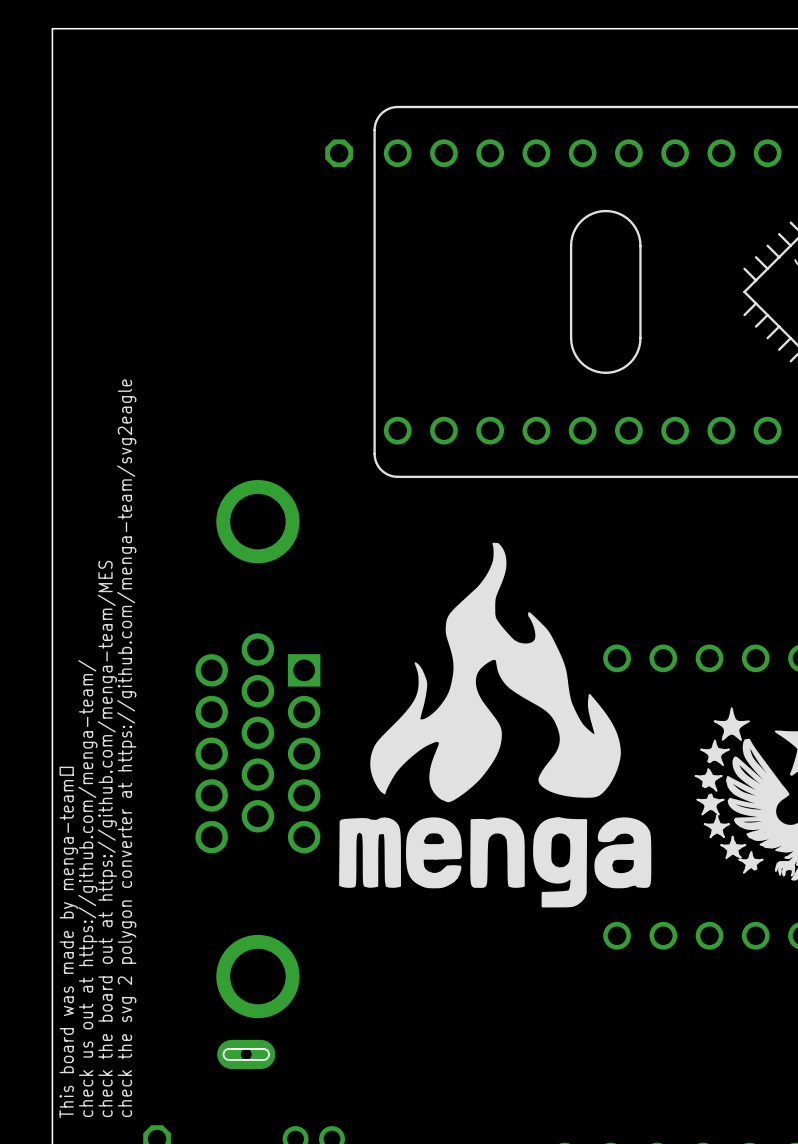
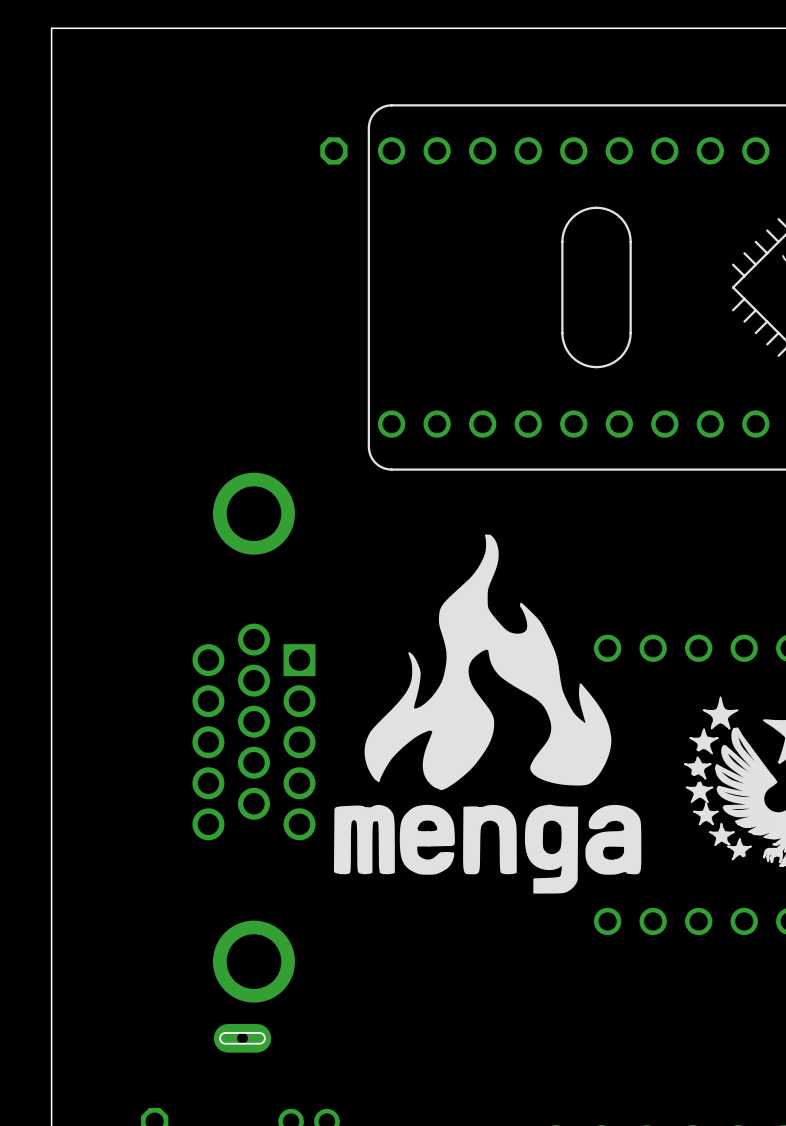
text: check the svg 2 polygon converter at https://github.com/menga-team/svg2eagle (126, 748) -> none
text: check the board out at https://github.com/menga-team/MES (107, 838) -> none
text: check us out at https://github.com/menga-team/ (87, 888) -> none
text: This board was made by menga-team™ (68, 942) -> none

